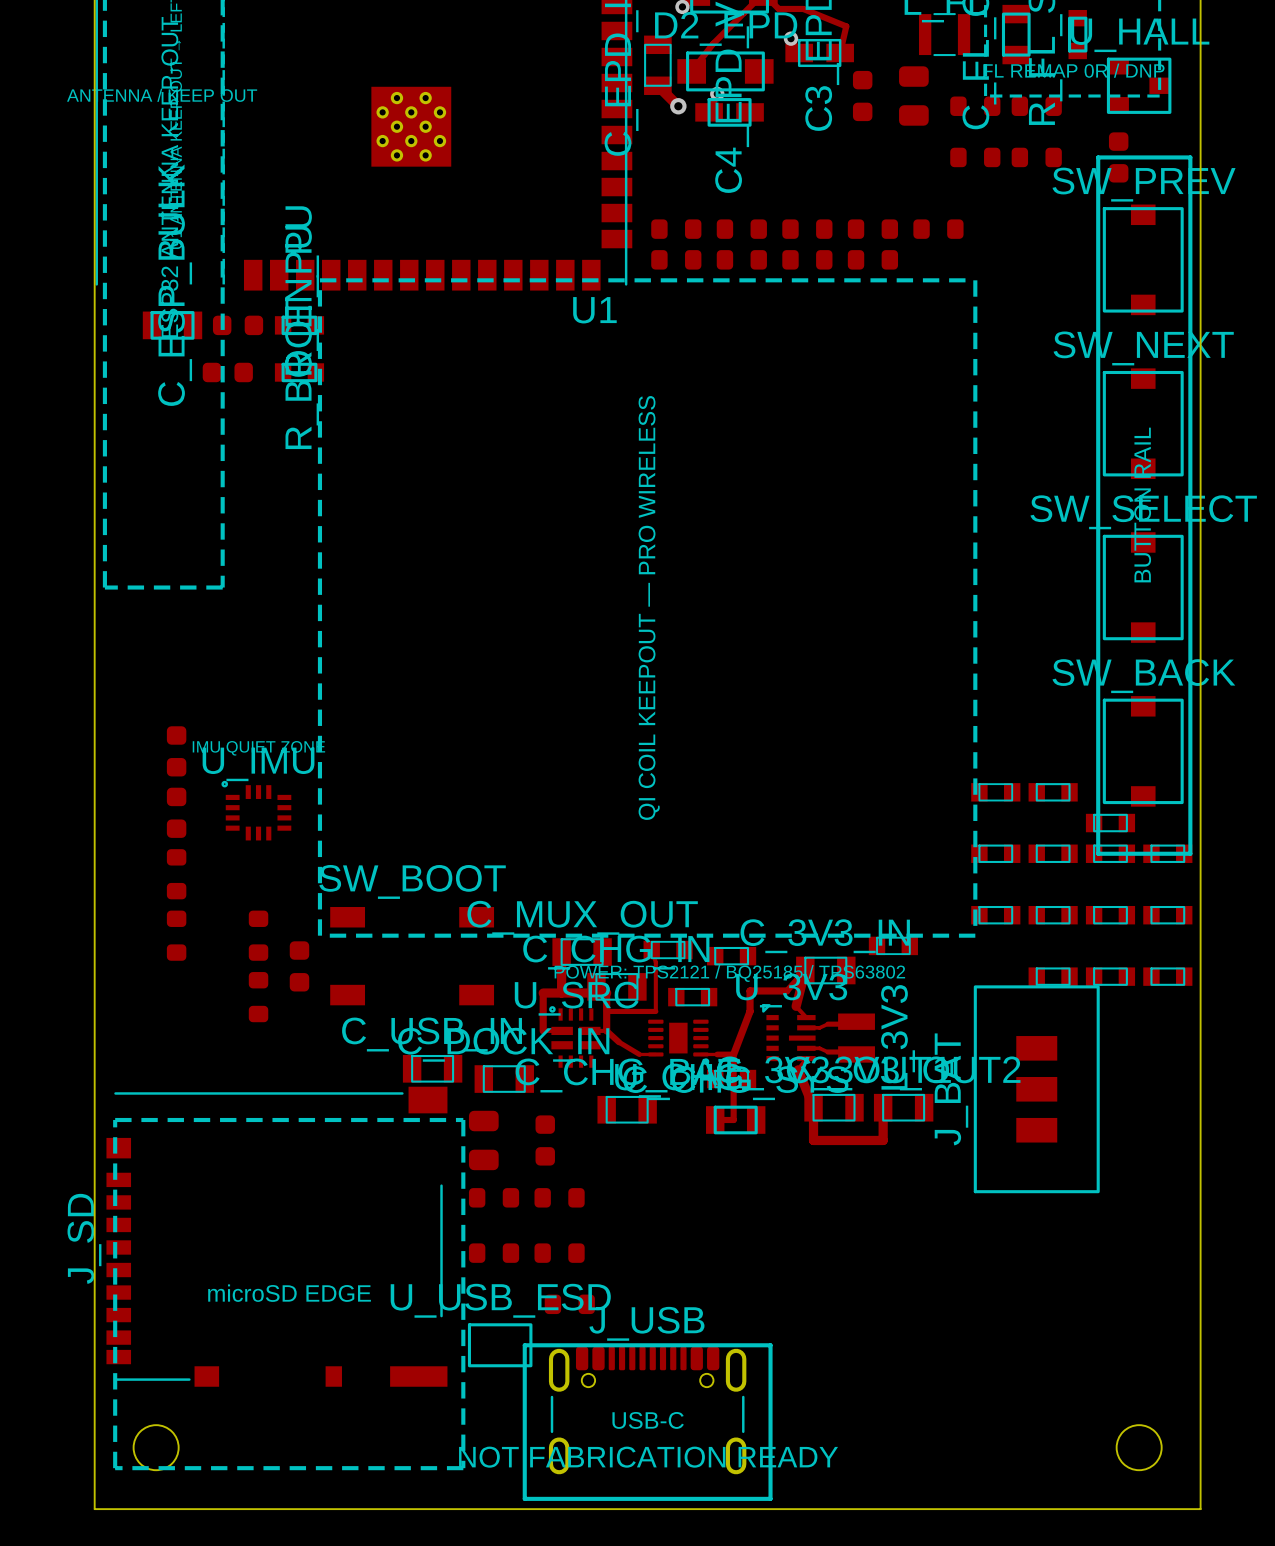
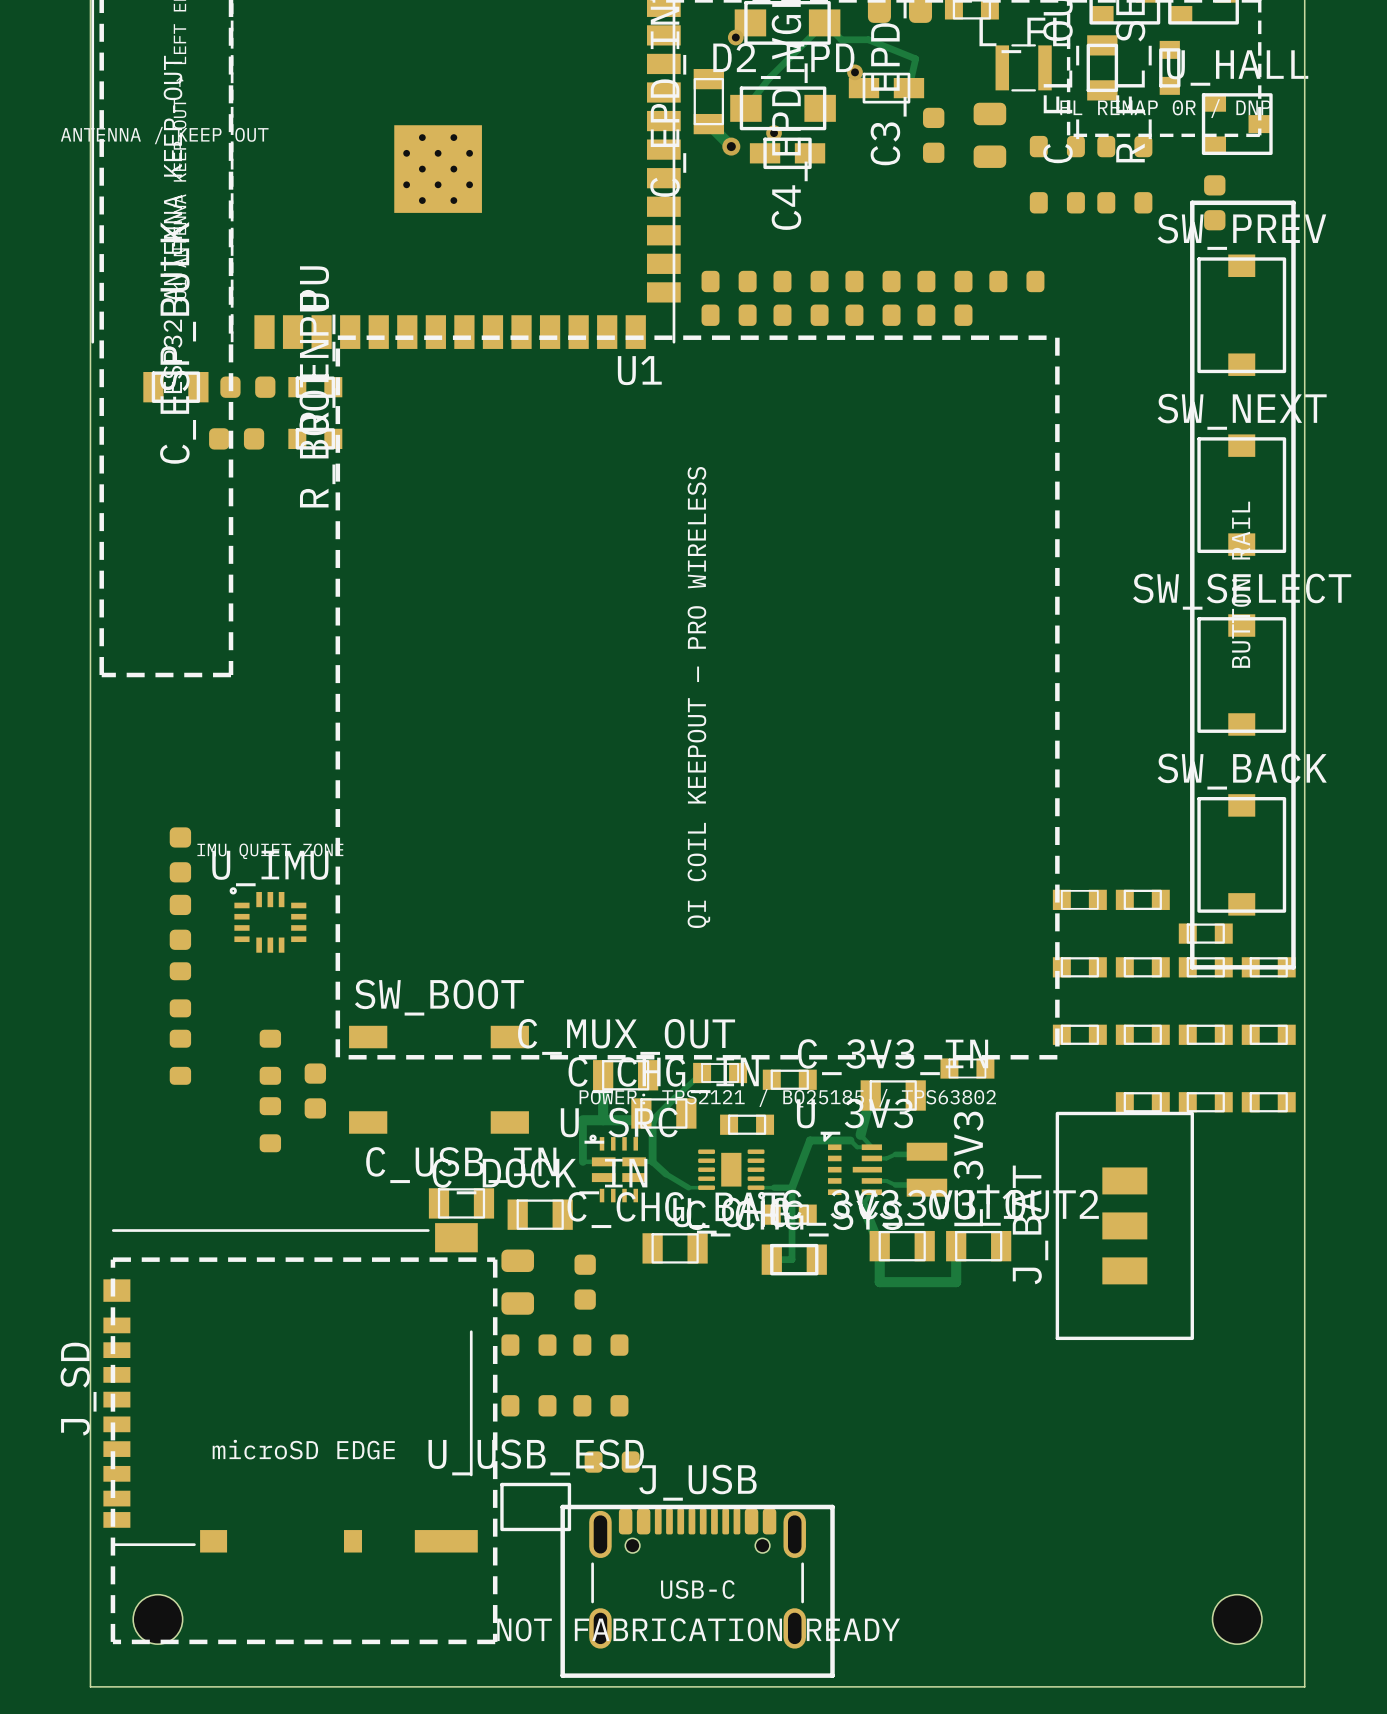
track: (651, 950) (655, 962) (655, 1011) (606, 1011) (606, 993) -> (702, 1073) (652, 1120)
track: (805, 970) (786, 990) (750, 990) (750, 1011) -> (871, 1147) (857, 1147) (850, 1140) (810, 1140)

